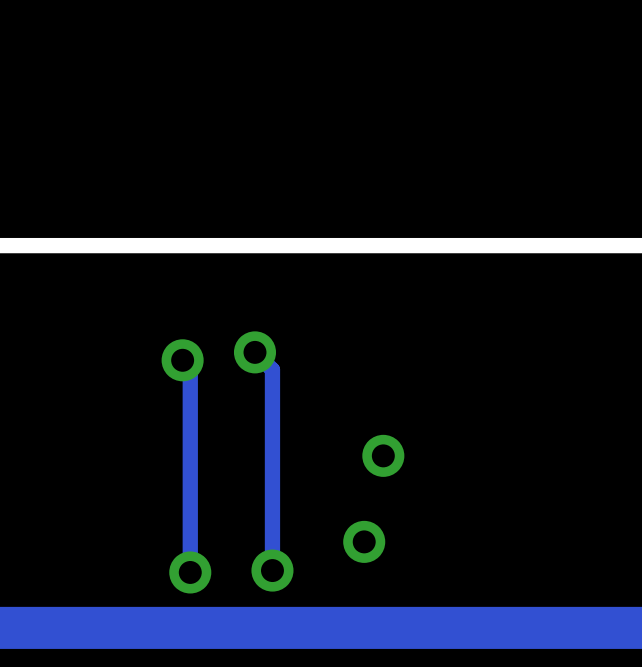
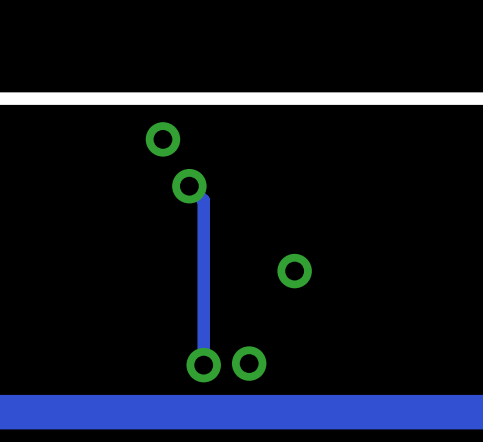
track: (182, 360) (190, 367) (190, 572) -> none
via position: (182, 360) -> (162, 139)
via position: (364, 541) -> (249, 363)
via: (190, 572) -> none

